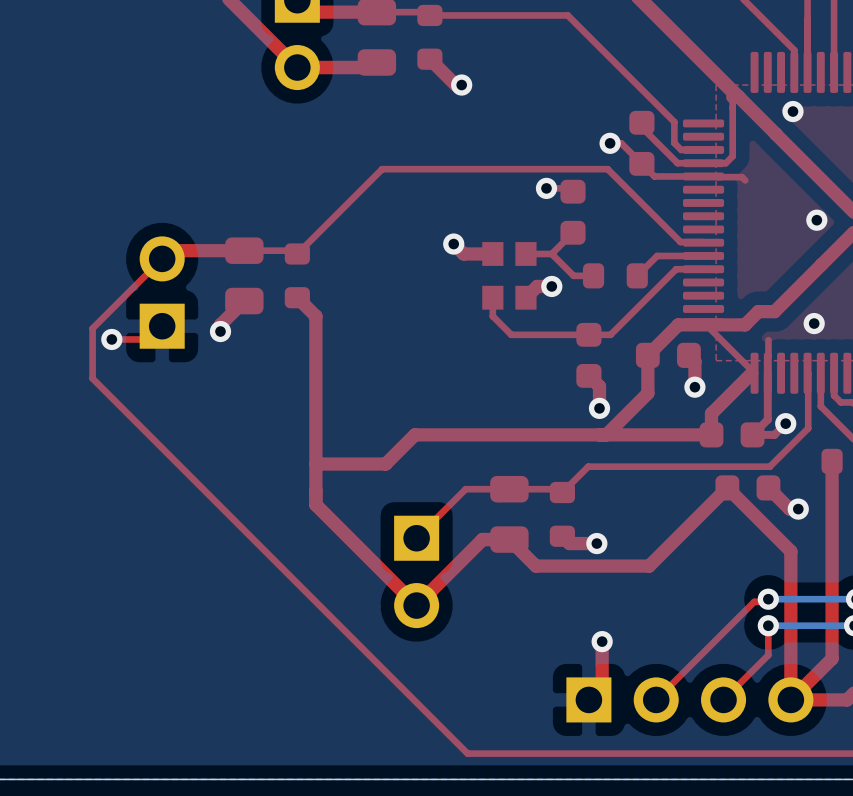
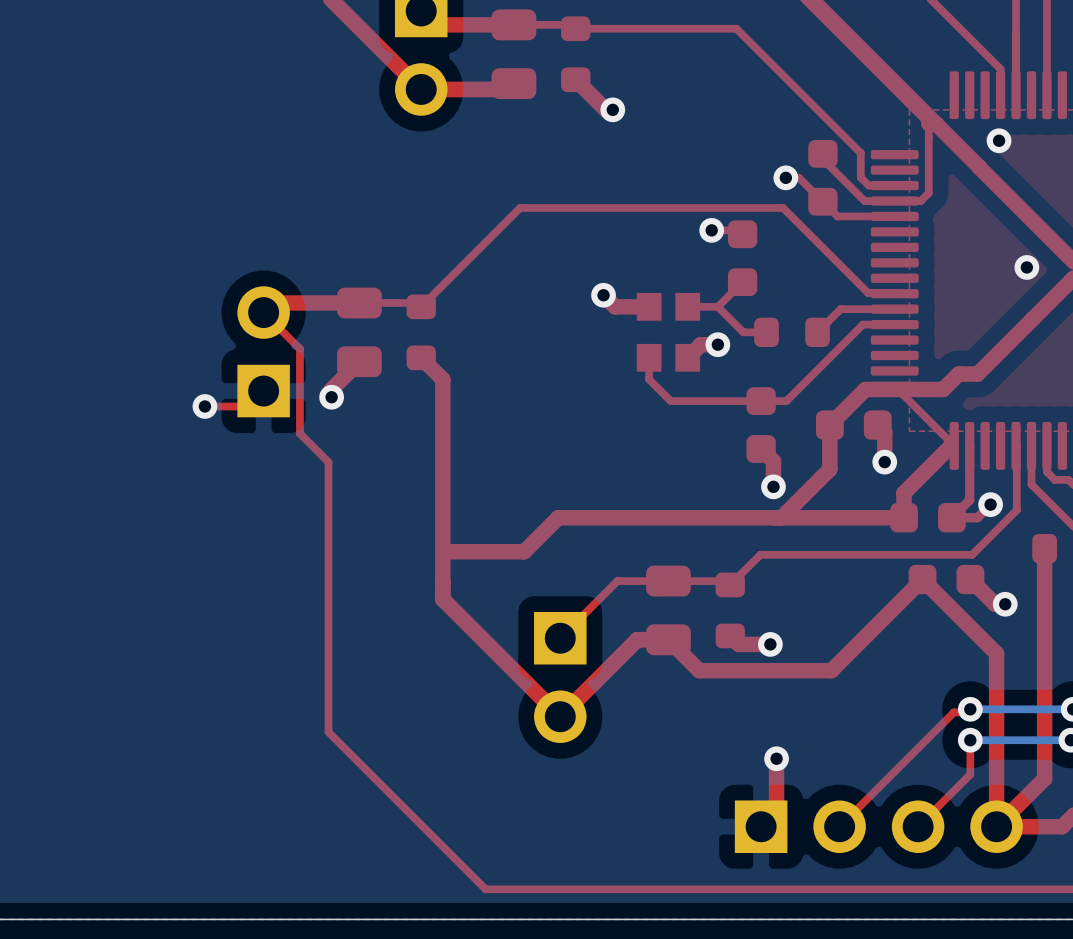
top track: (703, 176) (741, 177) (745, 180) -> none
top track: (162, 258) (92, 328) (92, 378) (467, 753) -> (263, 312) (299, 348) (299, 433) (328, 462) (328, 732) (485, 889) (619, 889)
via: (814, 323) -> none
top track: (768, 340) (767, 373) -> none

